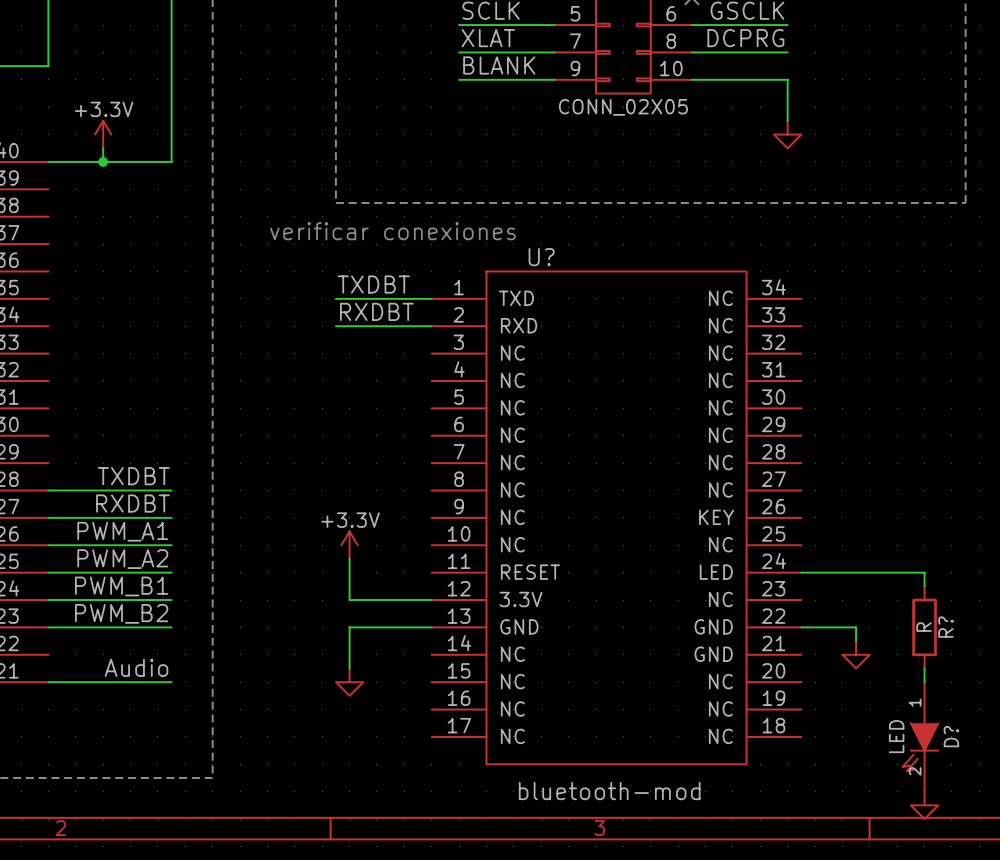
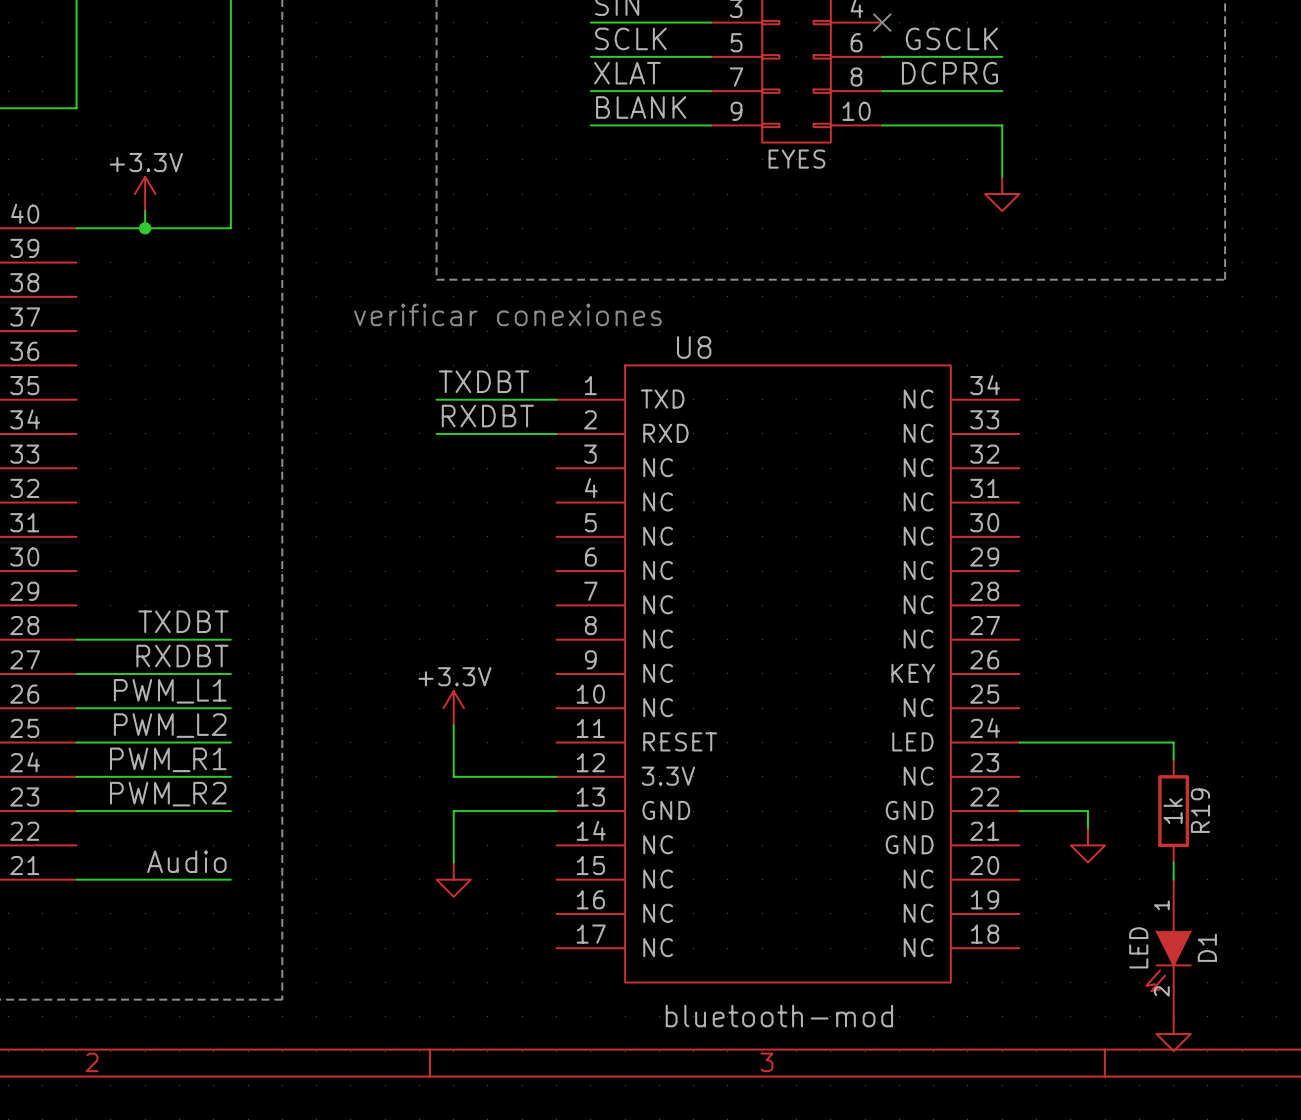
part value: CONN_02X05 (623, 107) -> EYES (796, 159)
U? name: U? (541, 257) -> U8 (694, 347)
label: PWM_A1 (122, 531) -> PWM_L1 (170, 691)
label: PWM_A2 (122, 559) -> PWM_L2 (170, 725)
label: PWM_B1 (121, 586) -> PWM_R1 (168, 759)
label: PWM_B2 (121, 613) -> PWM_R2 (168, 794)
R? value: R (924, 627) -> 1k (1173, 811)
R? name: R? (945, 627) -> R19 (1200, 810)
D? name: D? (951, 736) -> D1 (1207, 947)

